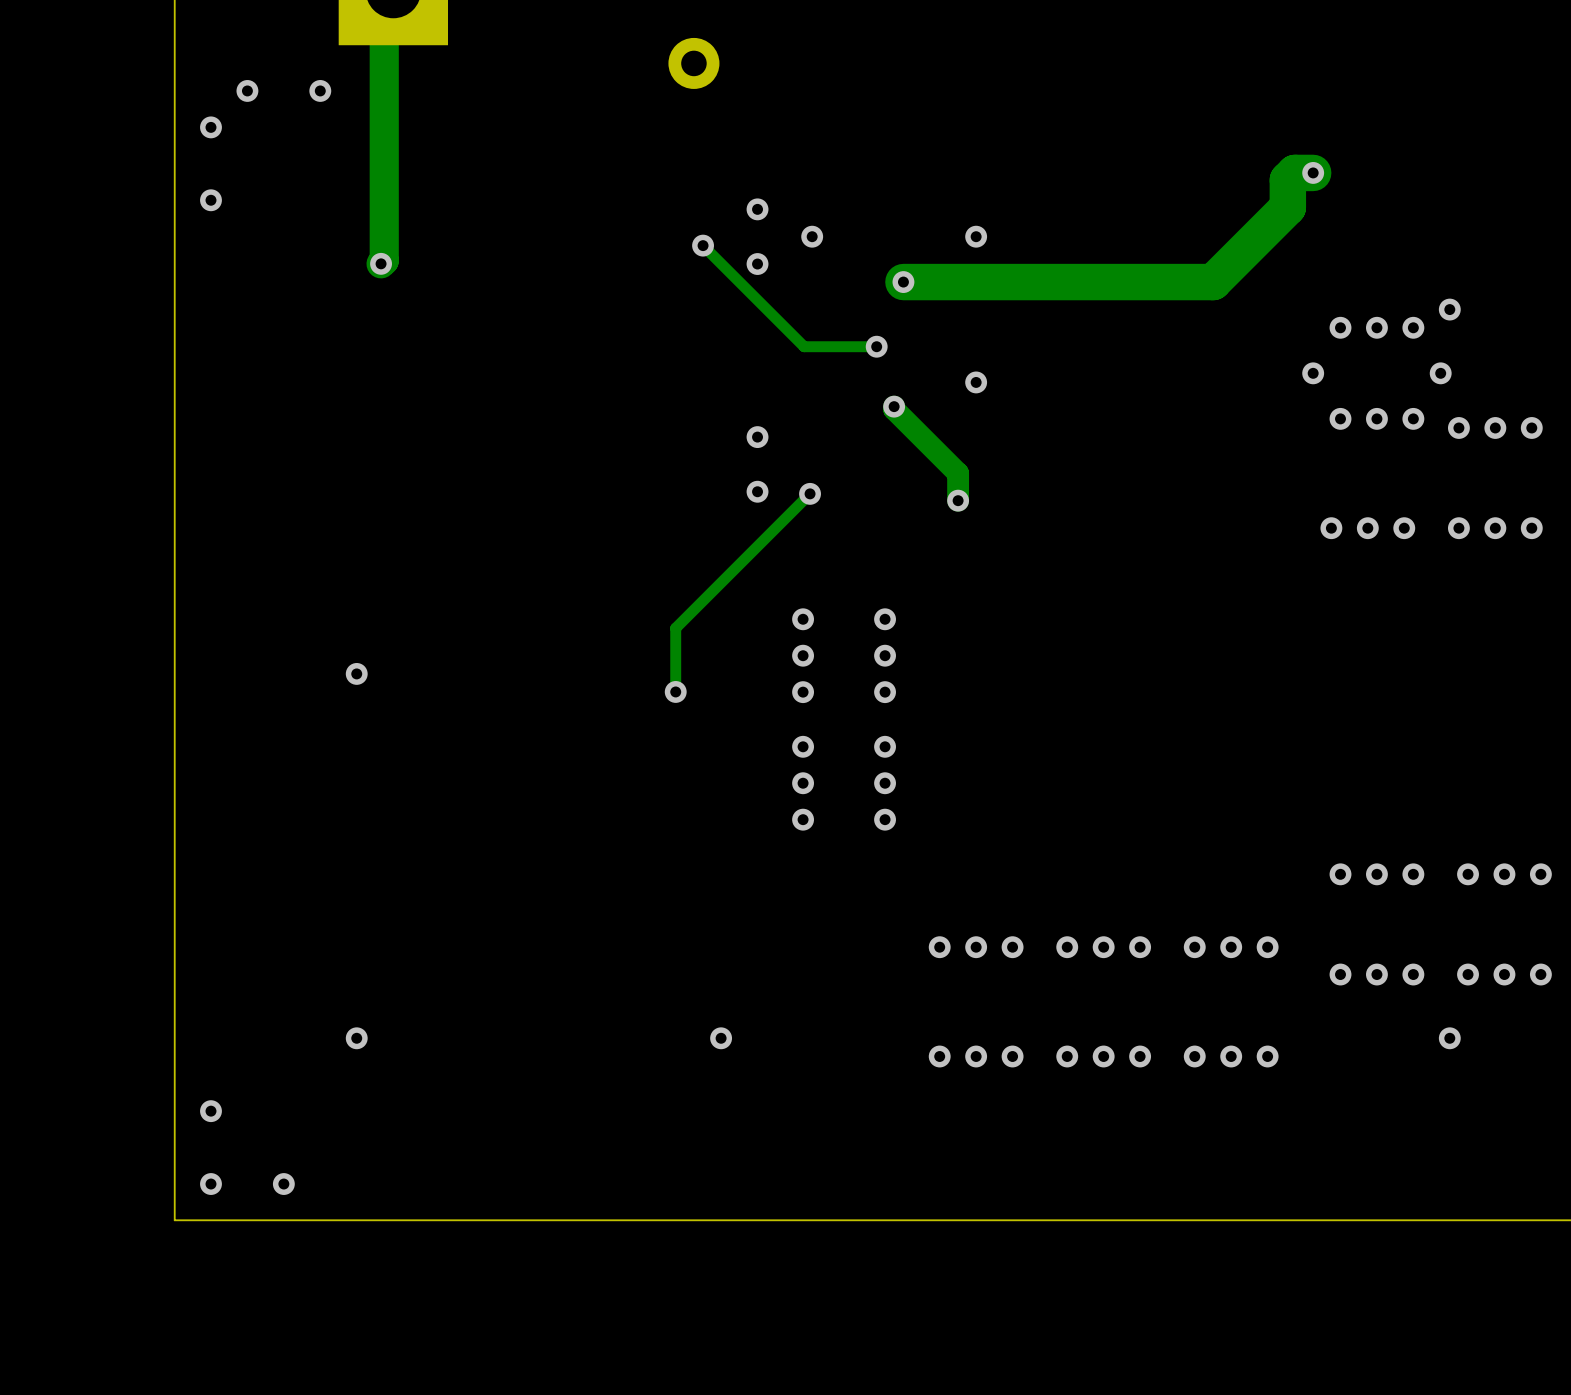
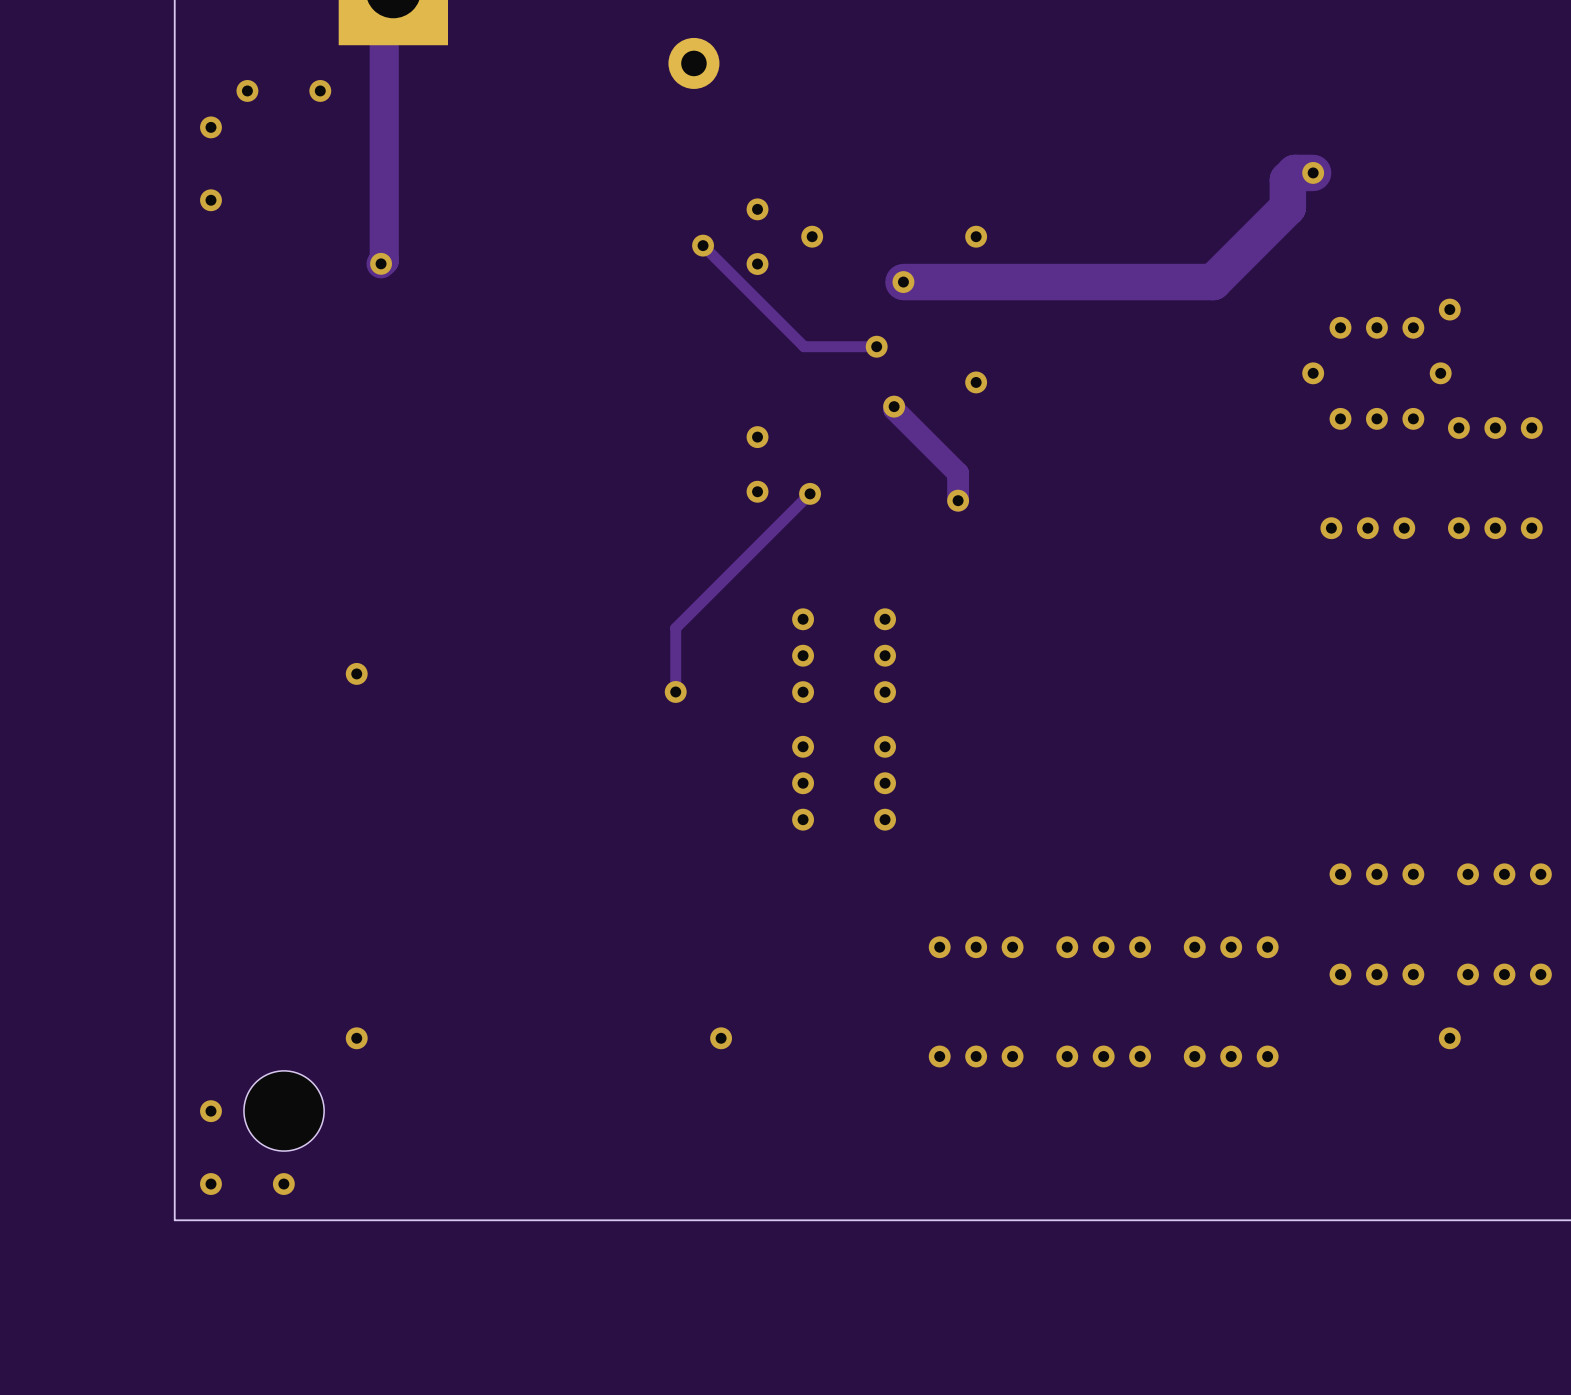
part: none -> (284, 1110)

